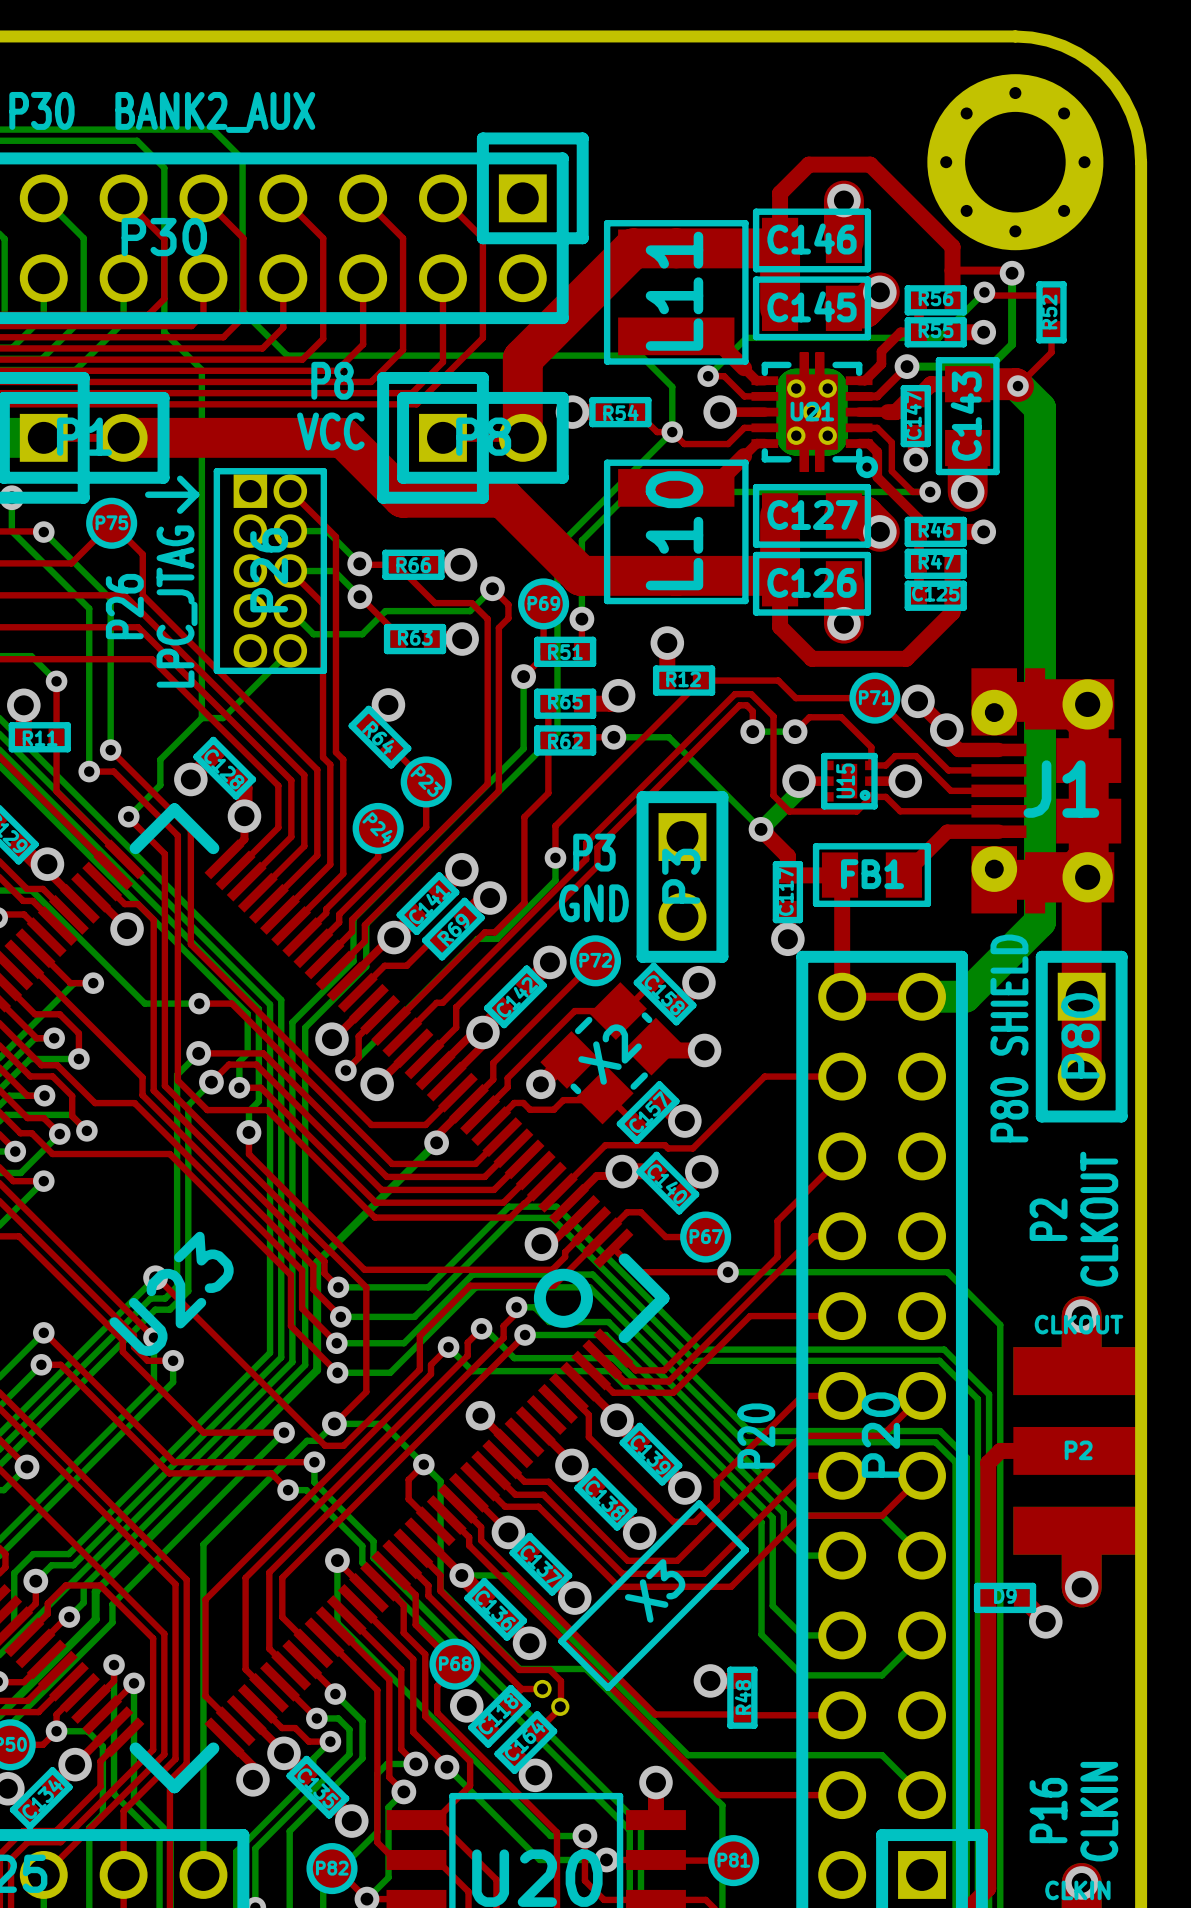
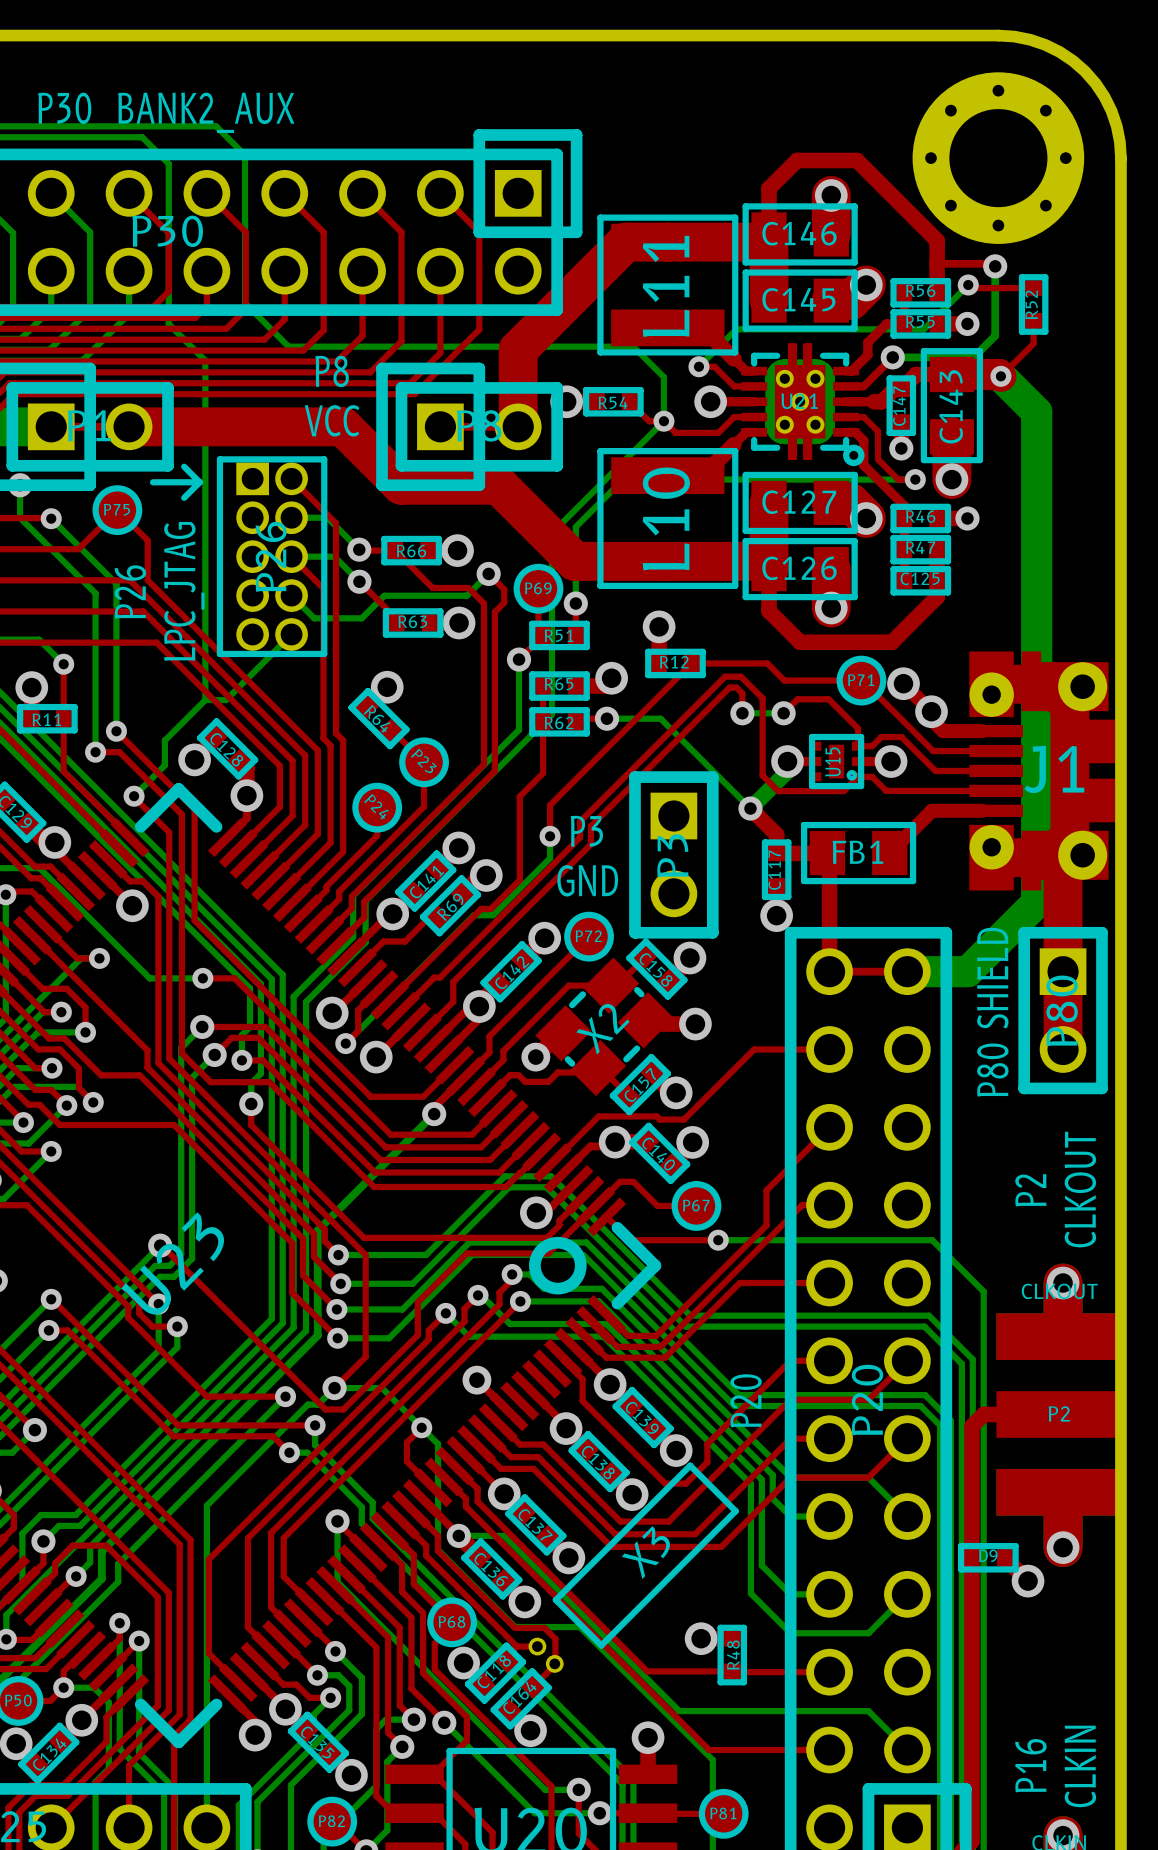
bottom track: (1040, 408) (1040, 921) (965, 996) -> (1022, 397) (1036, 412) (1036, 902) (967, 971) (949, 971)
J1 position: (1046, 790) -> (1042, 770)

